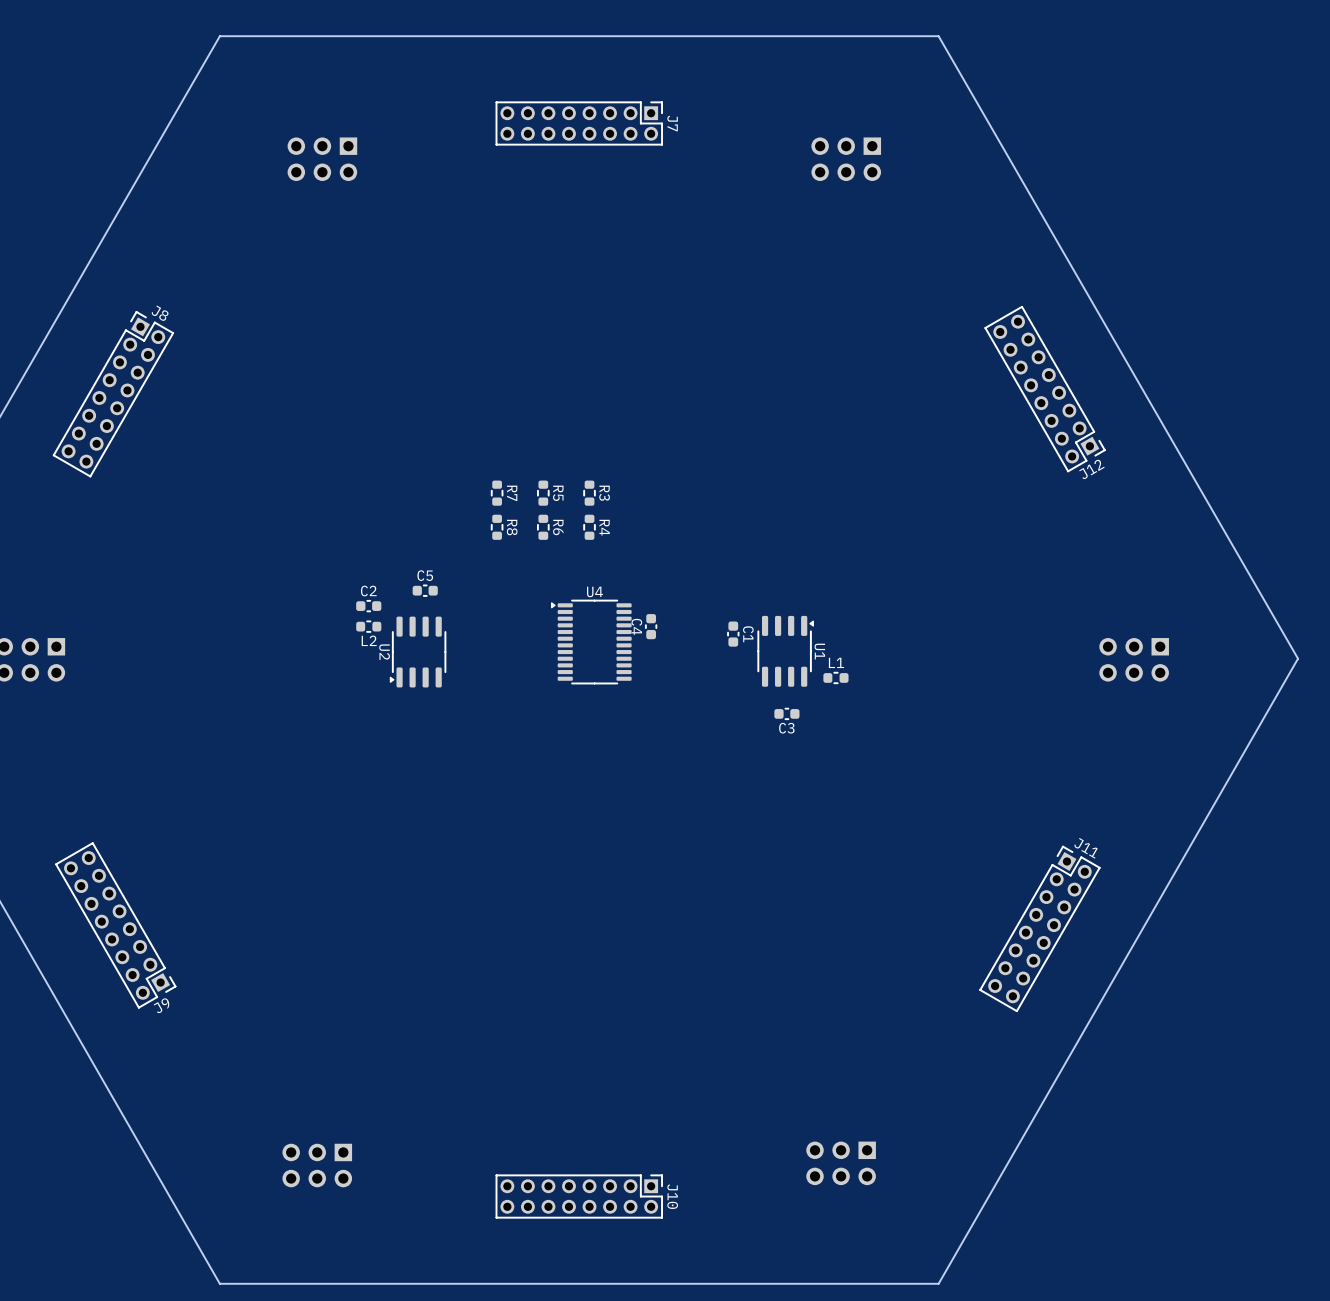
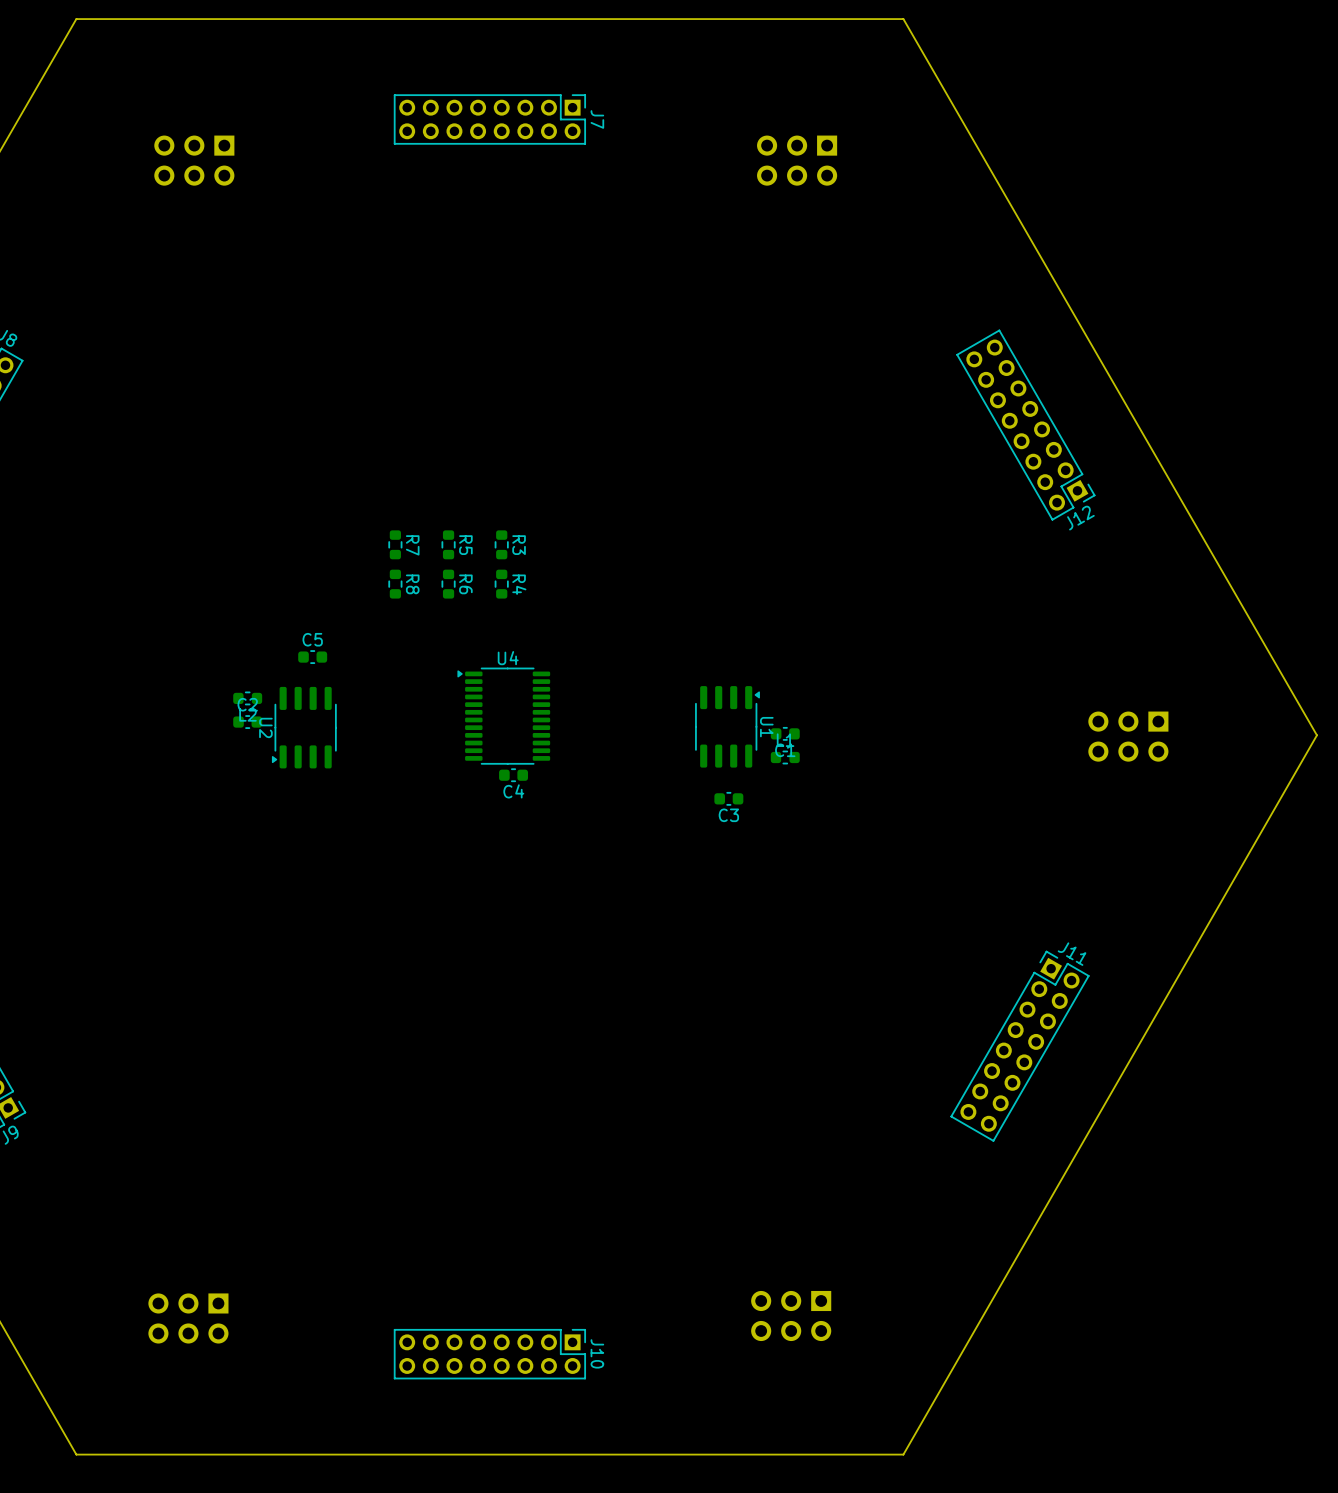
C2 position: (368, 606) -> (247, 722)
C4 name position: C4 (636, 626) -> C4 (513, 791)
C4 rotation: 0° (651, 626) -> 90° clockwise (513, 775)
C4 position: (651, 626) -> (513, 775)
C1 rotation: 0° (733, 634) -> 90° clockwise (785, 733)
C1 position: (733, 634) -> (785, 733)

